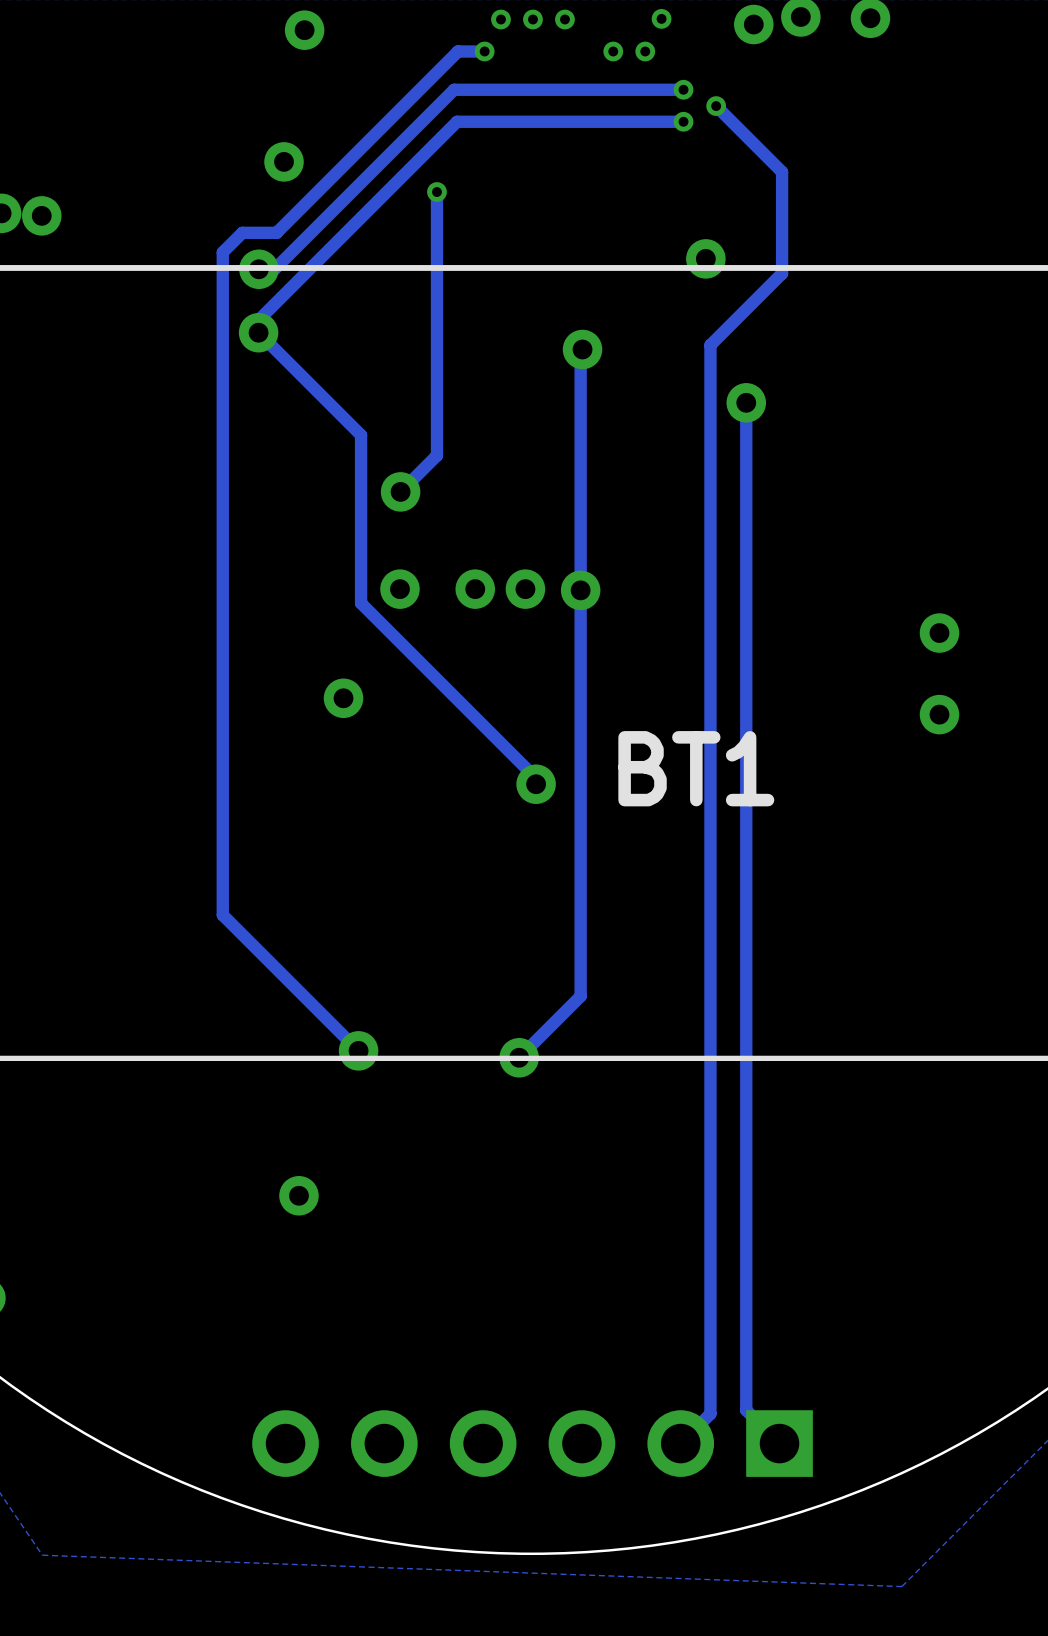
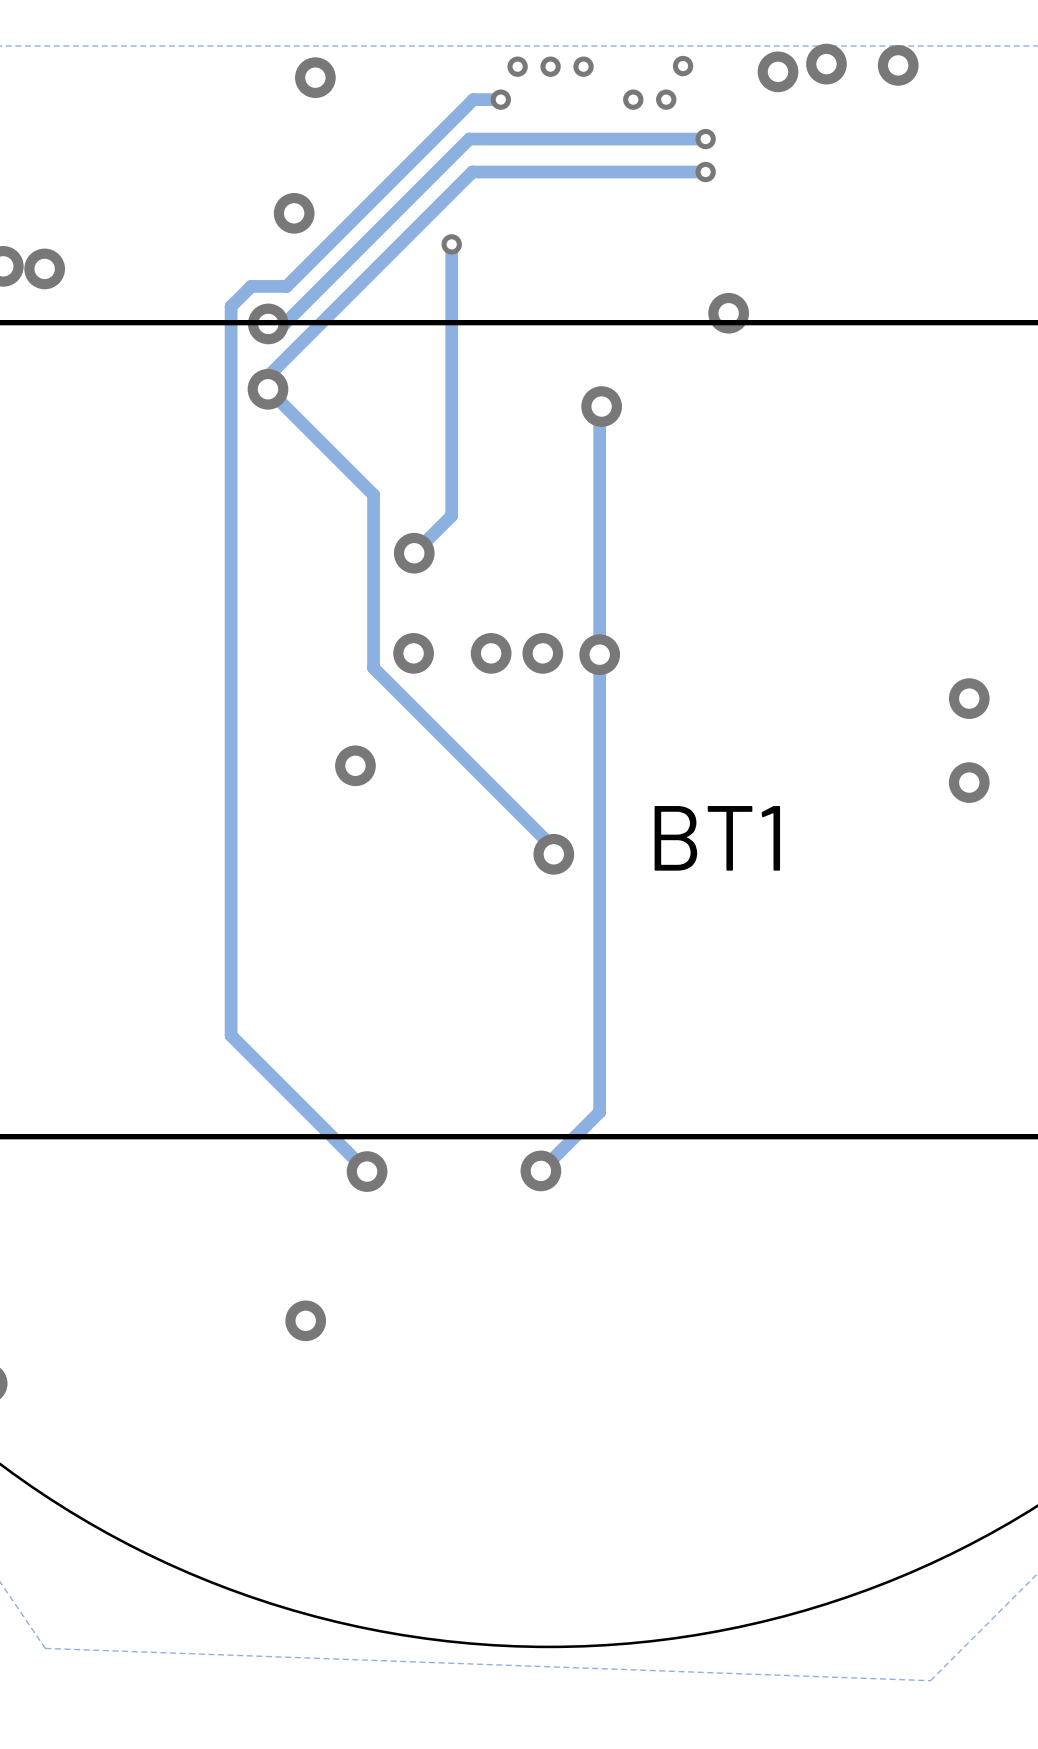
track: (716, 106) (782, 172) (782, 273) (710, 345) (710, 1413) (680, 1443) -> none
via: (716, 106) -> none
track: (746, 402) (746, 1410) (779, 1443) -> none
via: (746, 402) -> none
track: (222, 915) (358, 1050) -> (231, 989) (231, 1035) (367, 1171)
track: (580, 996) (519, 1057) -> (599, 1072) (599, 1112) (540, 1170)
via position: (358, 1050) -> (367, 1171)
via position: (519, 1057) -> (540, 1170)
via position: (298, 1195) -> (305, 1320)
part: (532, 1443) -> none

